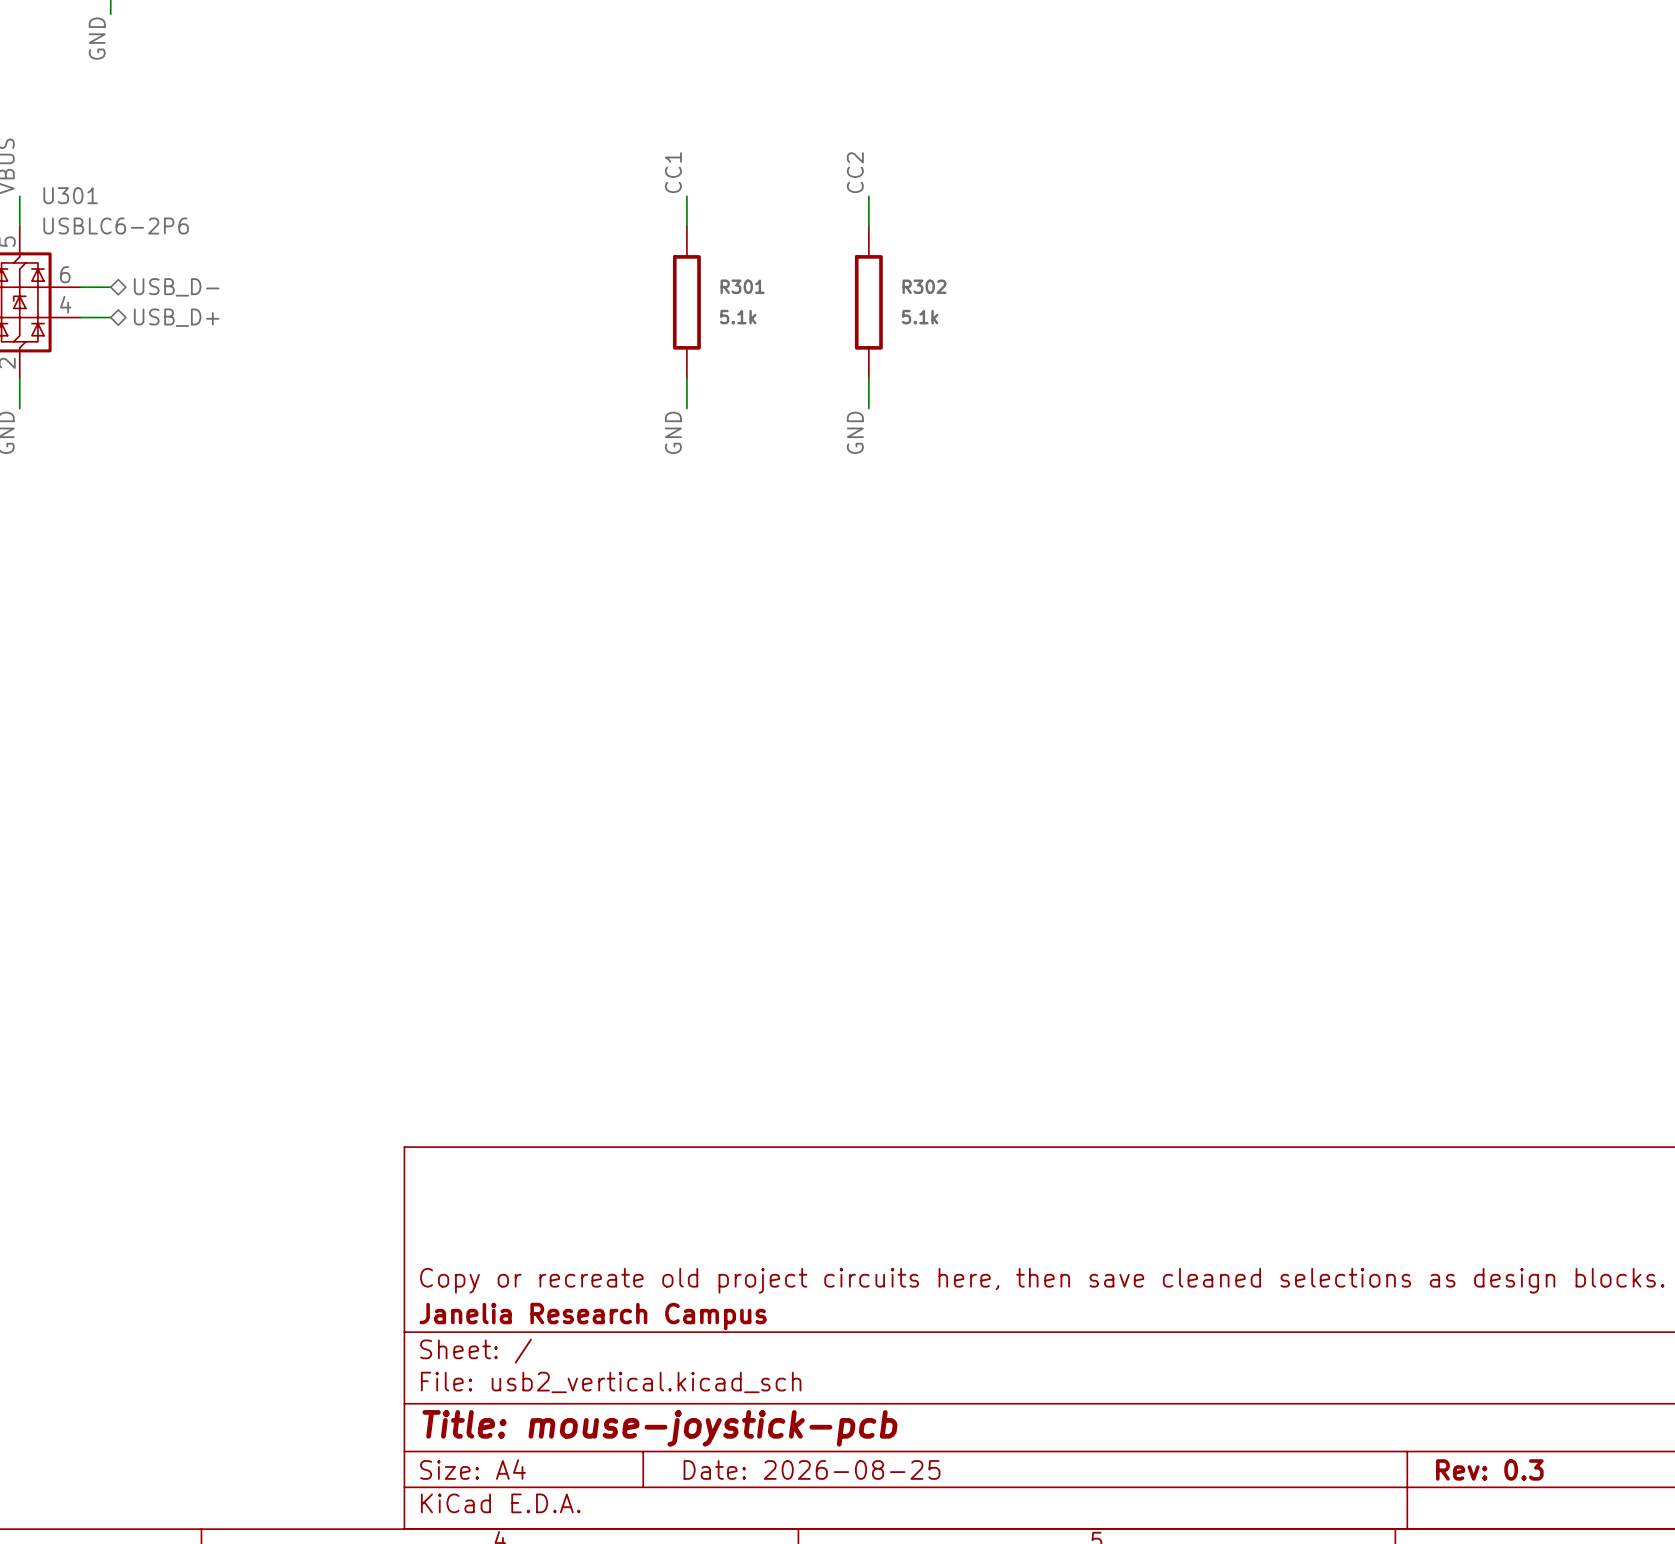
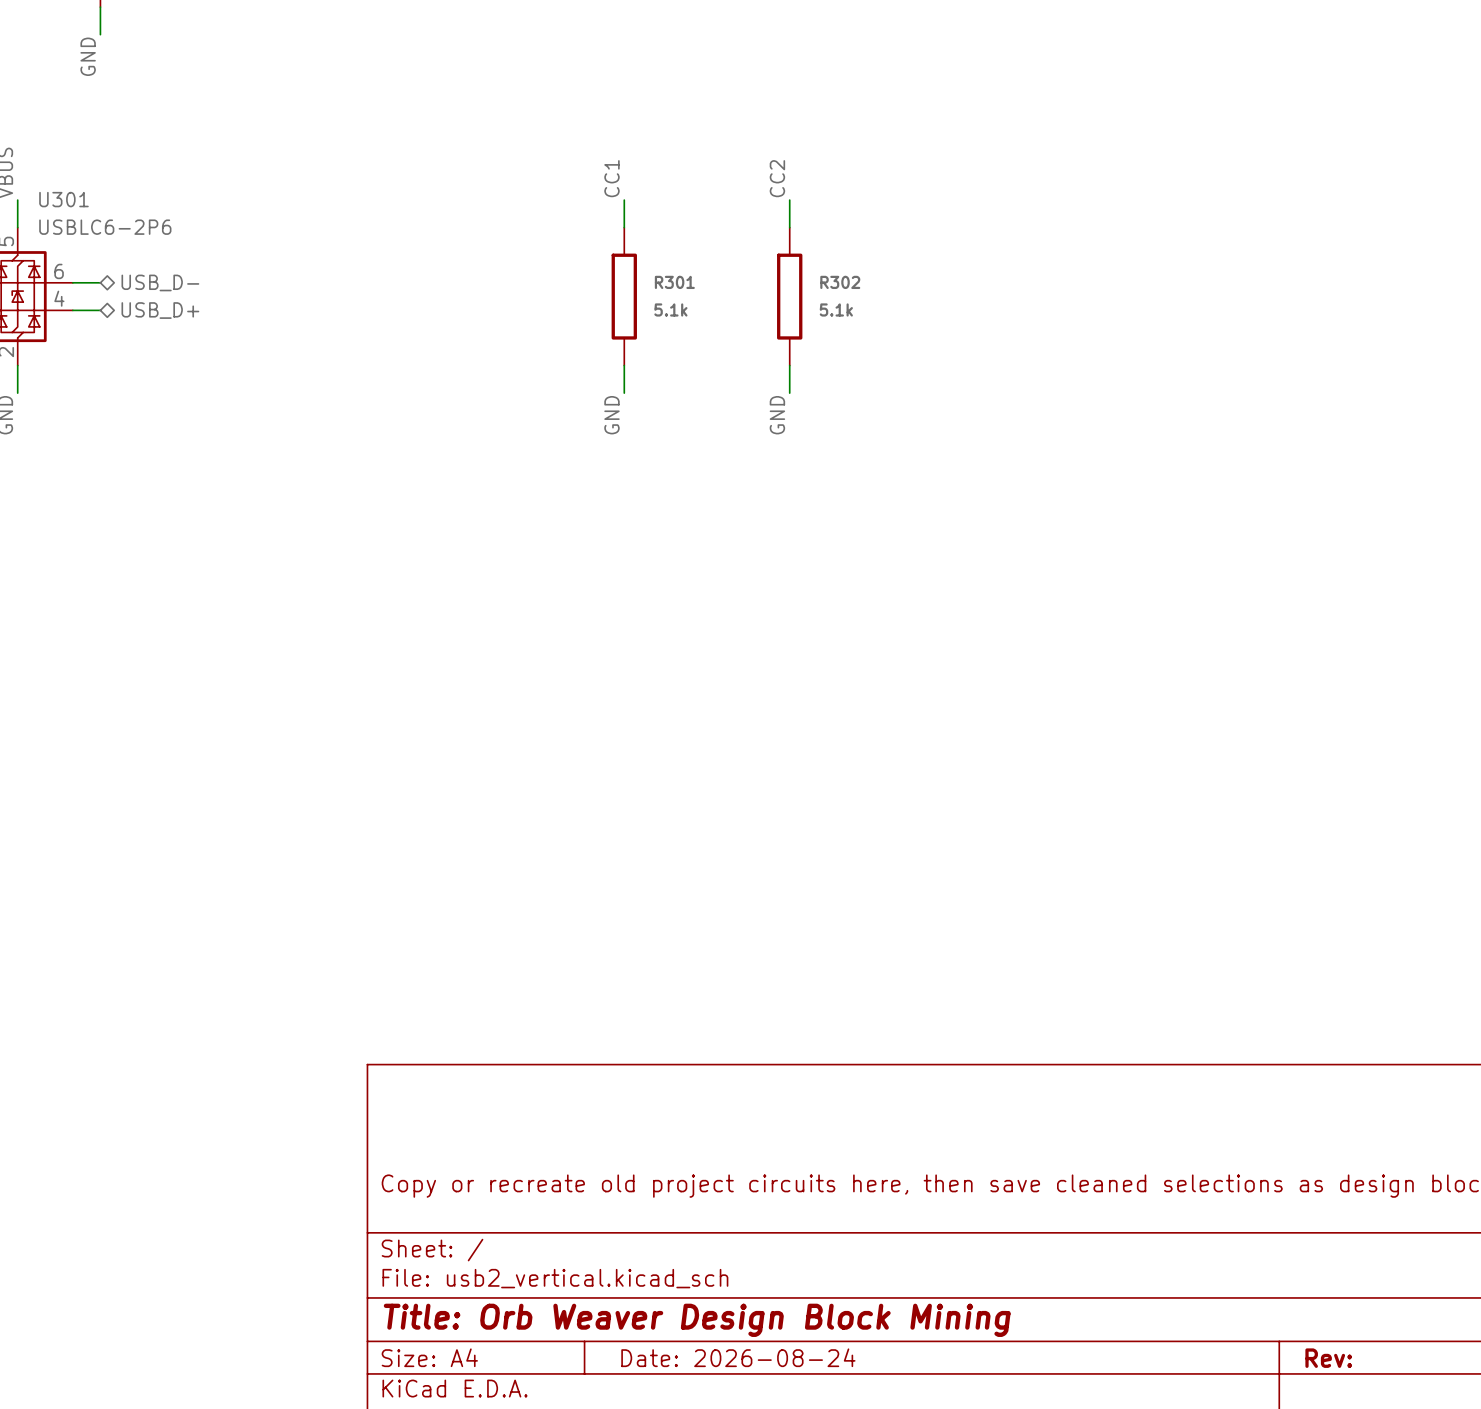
title block: Janelia Research Campus (593, 1316) -> none
title block: Title: mouse-joystick-pcb (659, 1428) -> Title: Orb Weaver Design Block Mining (697, 1320)
title block: Date: 2026-08-25 (811, 1469) -> Date: 2026-08-24 (738, 1357)
title block: Rev: 0.3 (1489, 1469) -> Rev: (1328, 1358)

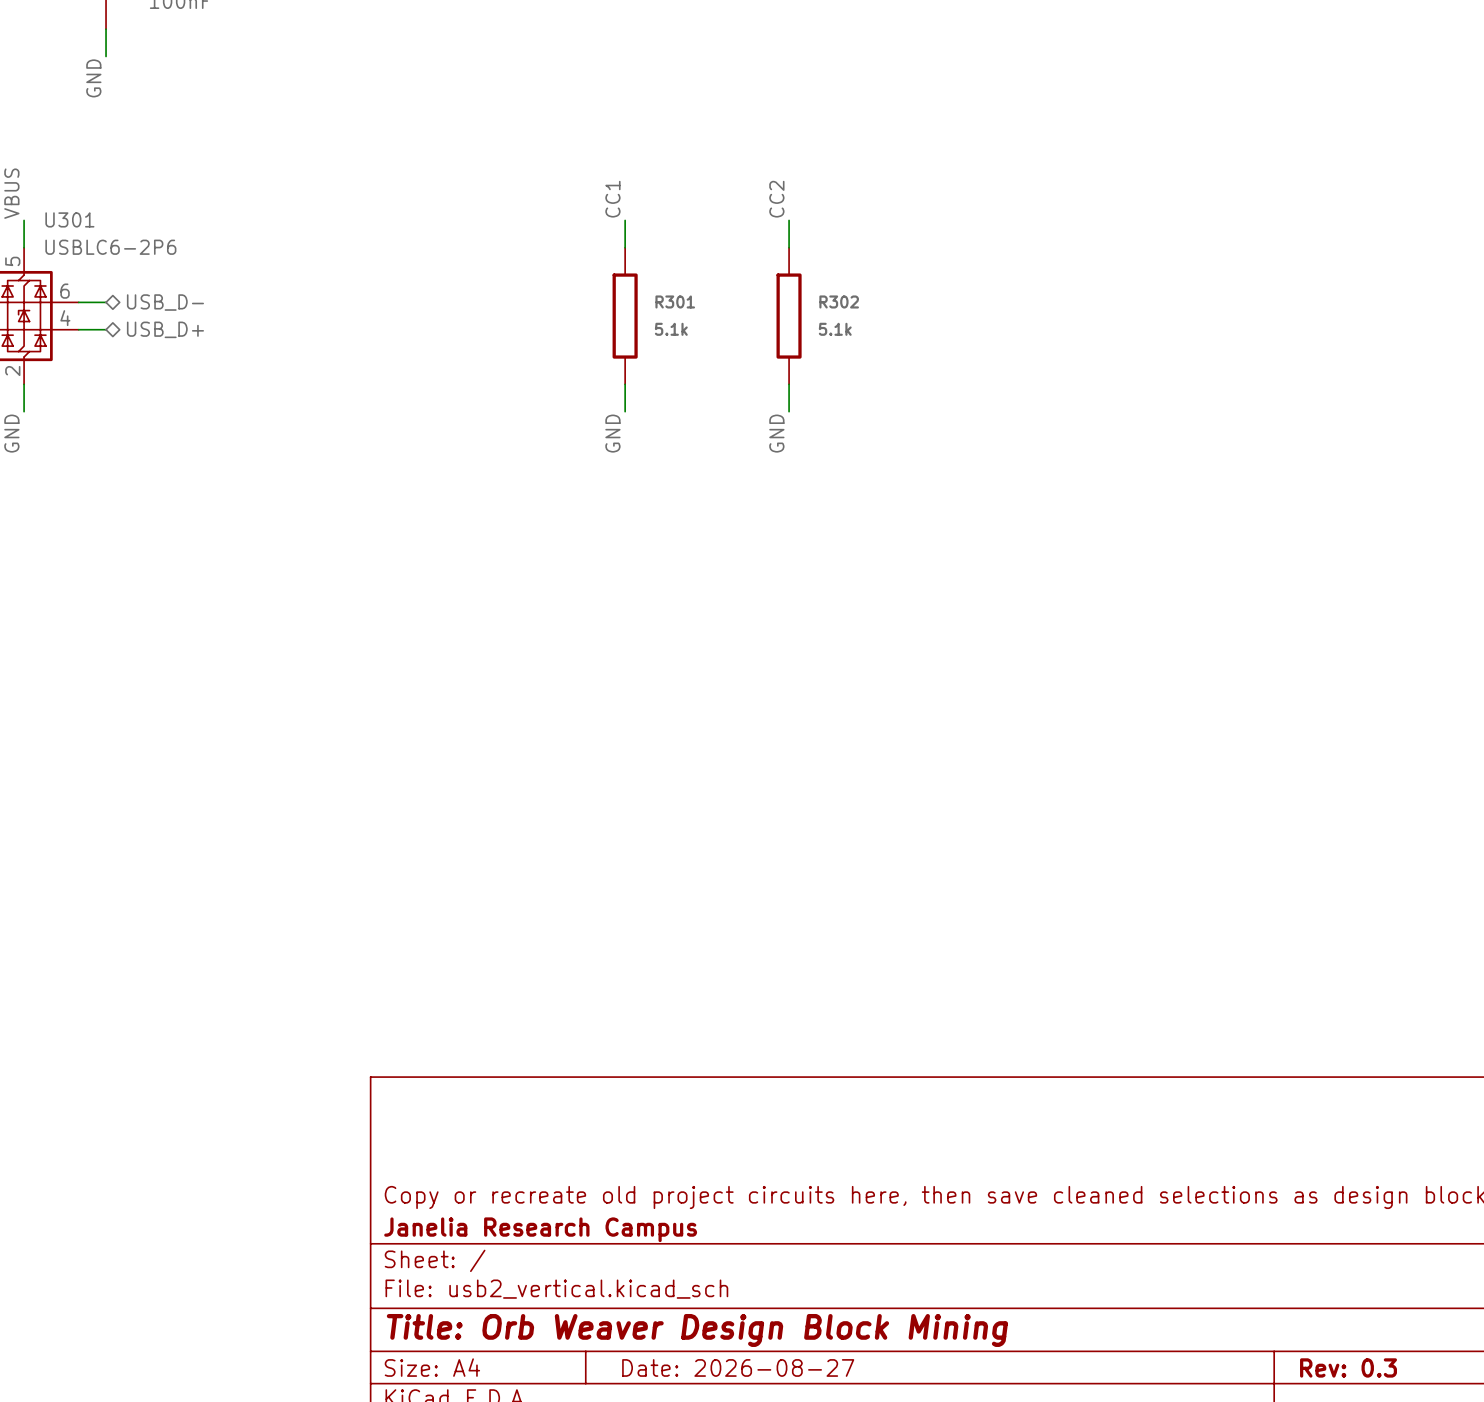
title block: none -> Janelia Research Campus (540, 1229)
title block: Date: 2026-08-24 (738, 1357) -> Date: 2026-08-27 (738, 1367)
title block: Rev: (1328, 1358) -> Rev: 0.3 (1348, 1367)

